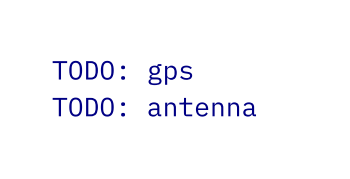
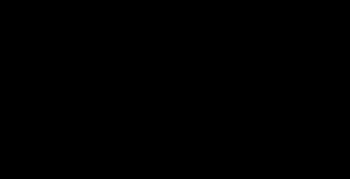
text: TODO: gps (122, 72) -> none
text: TODO: antenna (154, 107) -> none

